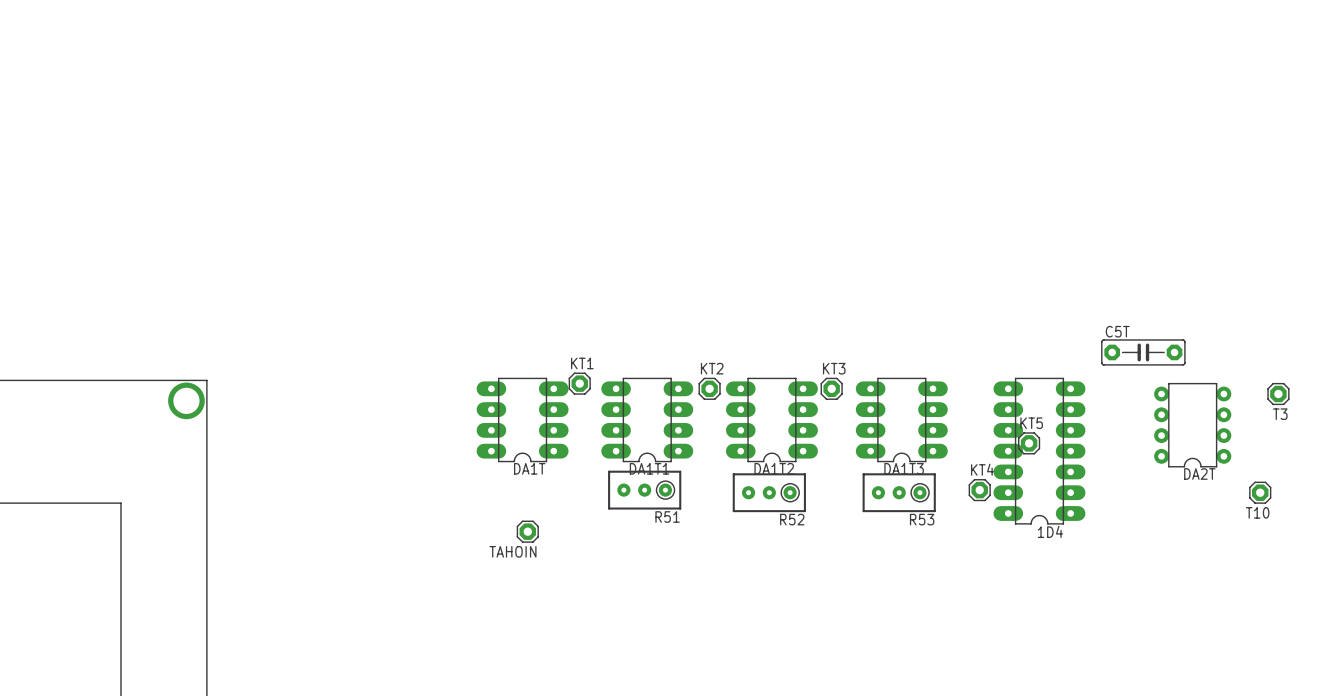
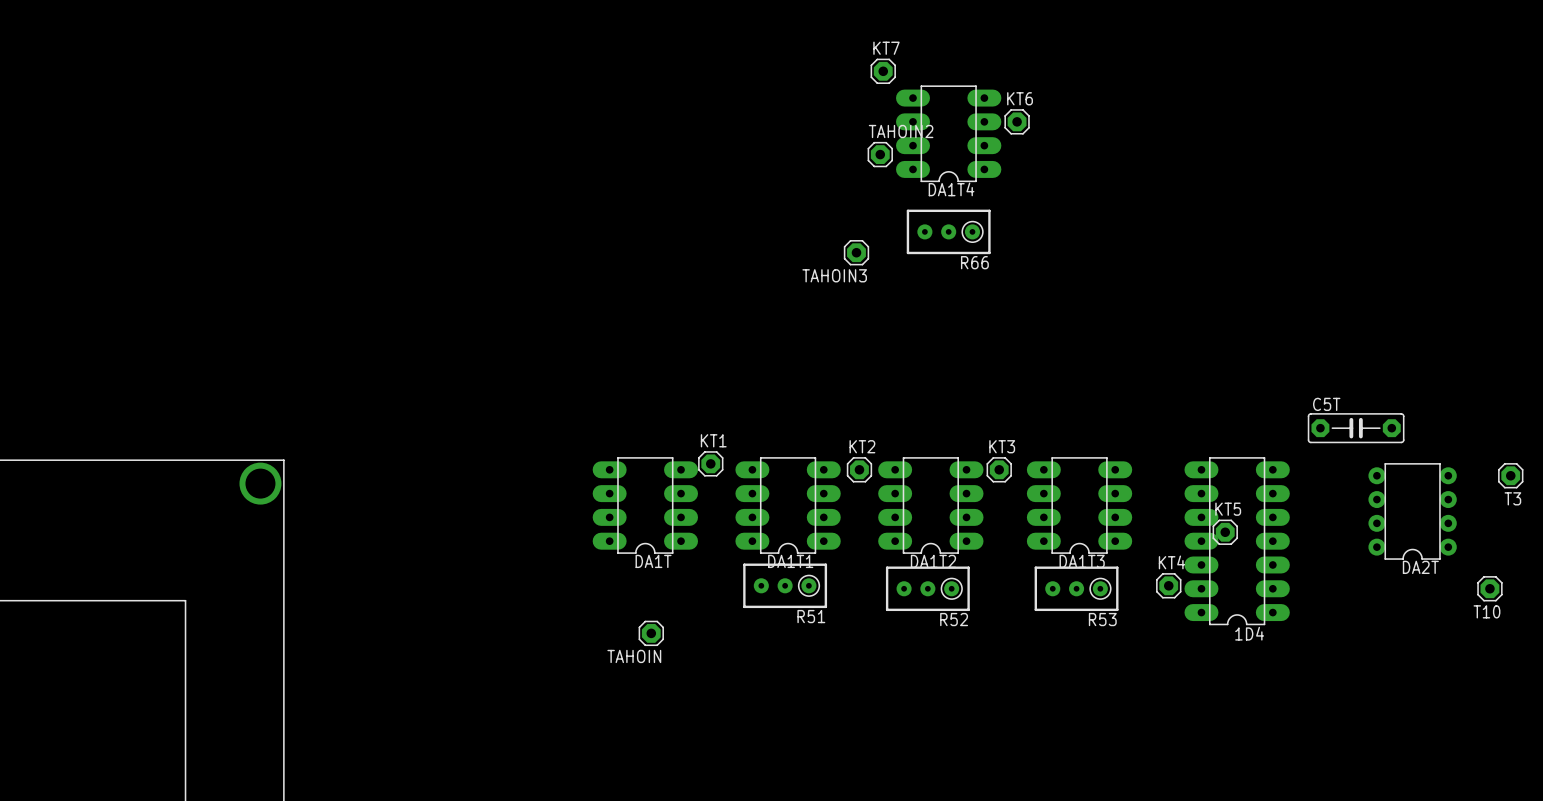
KT7: none -> (883, 71)
KT6: none -> (1017, 121)
DA1T4: none -> (948, 133)
TAHOIN2: none -> (880, 154)
R66: none -> (948, 231)
TAHOIN3: none -> (856, 252)

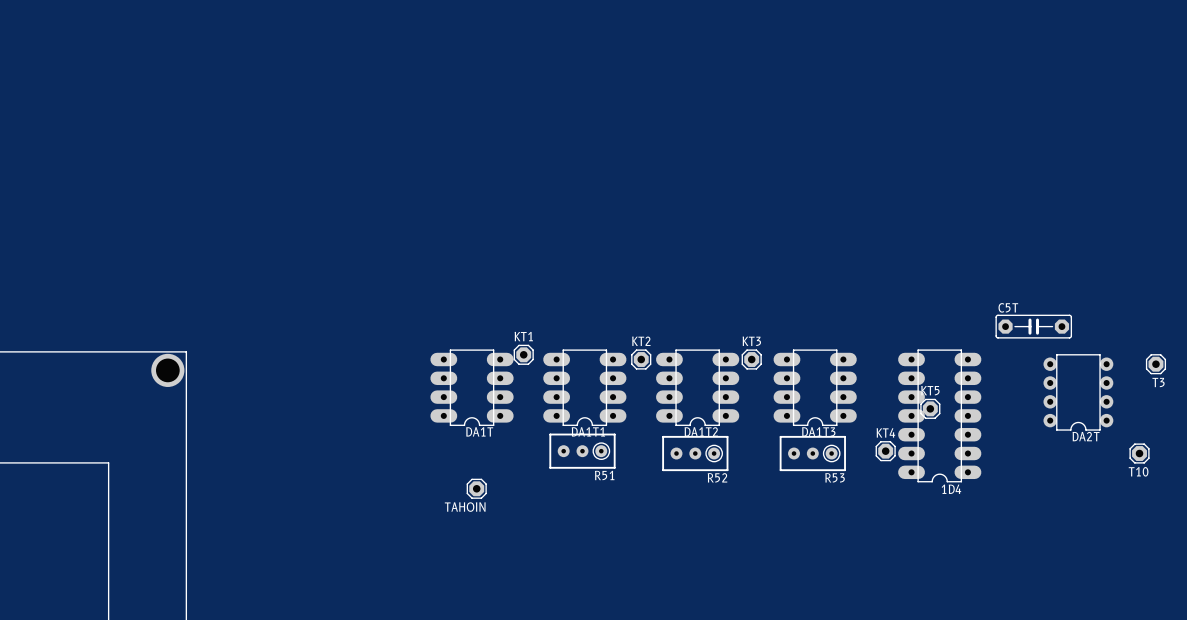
KT7: (883, 71) -> none
KT6: (1017, 121) -> none
DA1T4: (948, 133) -> none
TAHOIN2: (880, 154) -> none
R66: (948, 231) -> none
TAHOIN3: (856, 252) -> none

